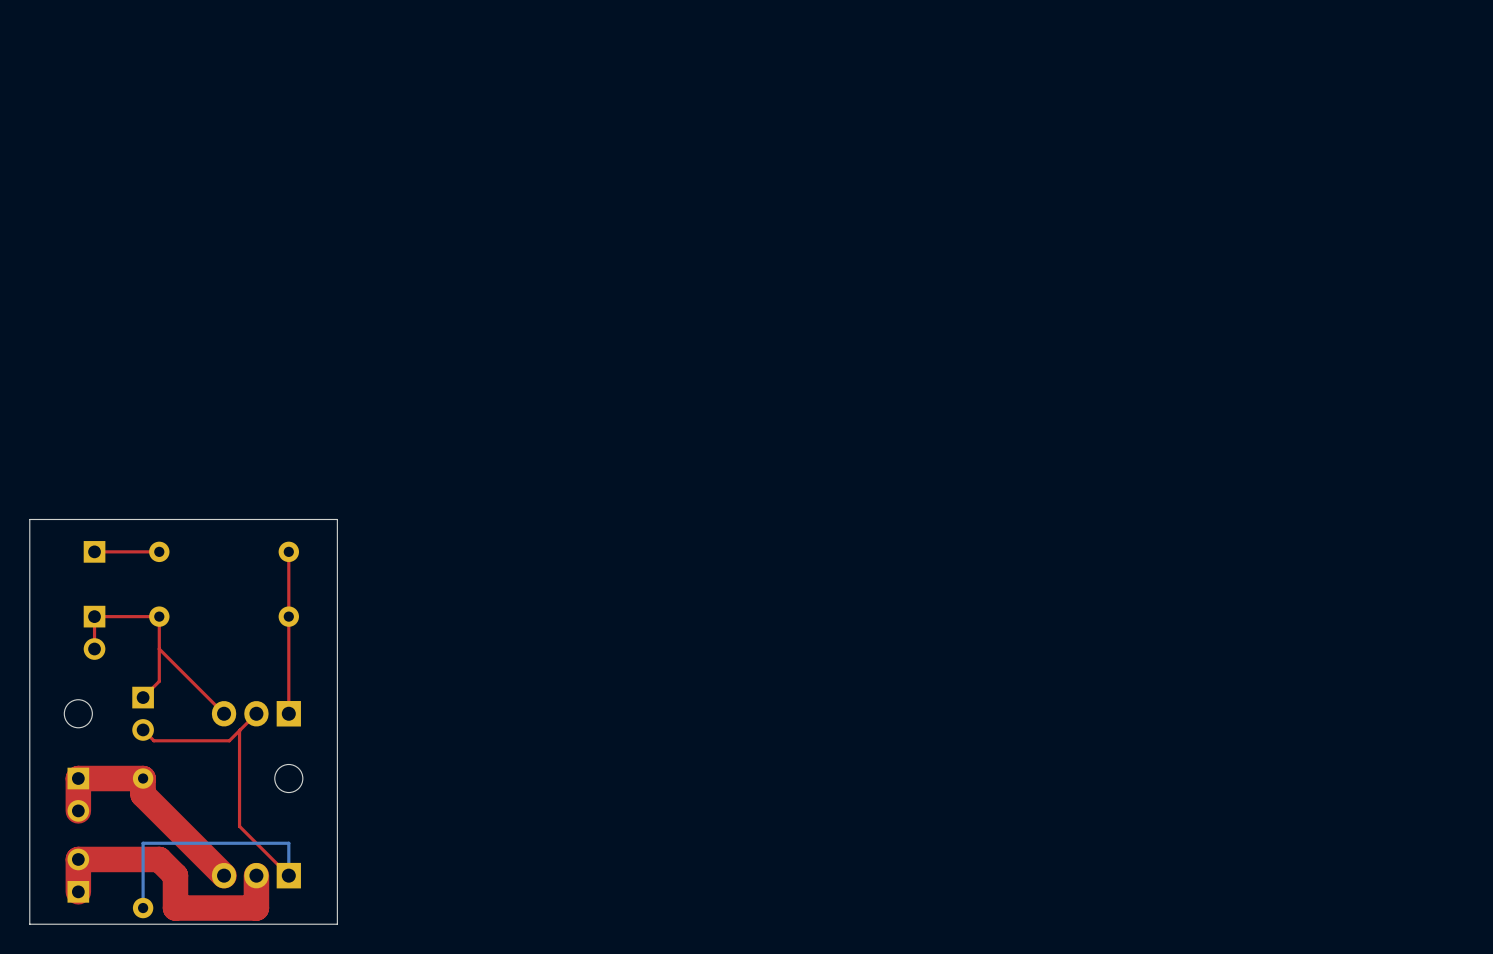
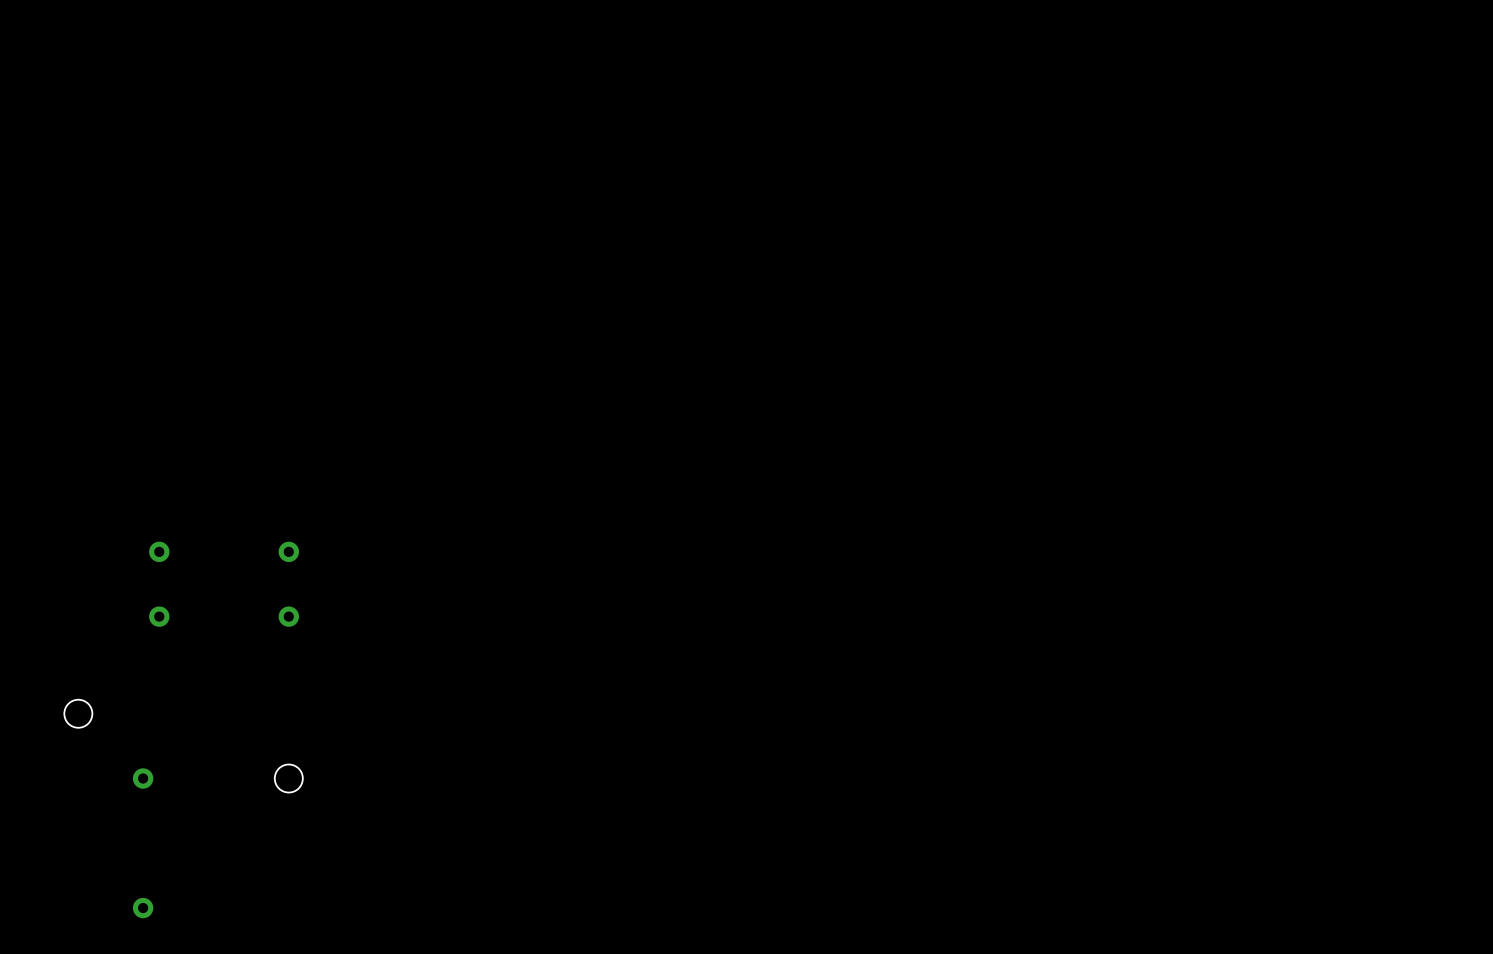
board edge: (337, 519) (29, 519) (29, 924) (337, 924) (337, 519) -> none
part: (94, 551) -> none
top track: (159, 551) (94, 551) -> none
top track: (288, 551) (288, 713) -> none
part: (94, 632) -> none
top track: (94, 649) (94, 616) (159, 616) (159, 681) (143, 697) -> none
top track: (159, 649) (224, 713) -> none
part: (143, 713) -> none
top track: (256, 713) (229, 740) (153, 740) (143, 729) -> none
part: (256, 713) -> none
top track: (239, 730) (239, 826) (288, 875) -> none
part: (78, 794) -> none
top track: (78, 810) (78, 778) (143, 778) (143, 794) (224, 875) -> none
part: (78, 875) -> none
top track: (256, 875) (256, 908) (175, 908) (175, 875) (159, 859) (78, 859) (78, 891) -> none
part: (256, 875) -> none
bottom track: (288, 875) (288, 843) (143, 843) (143, 908) -> none

